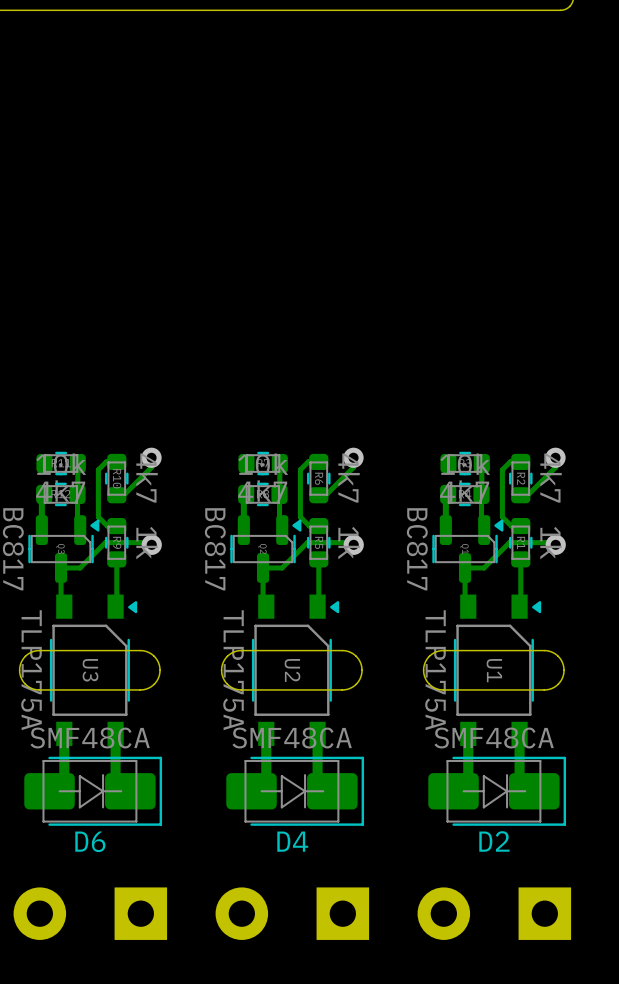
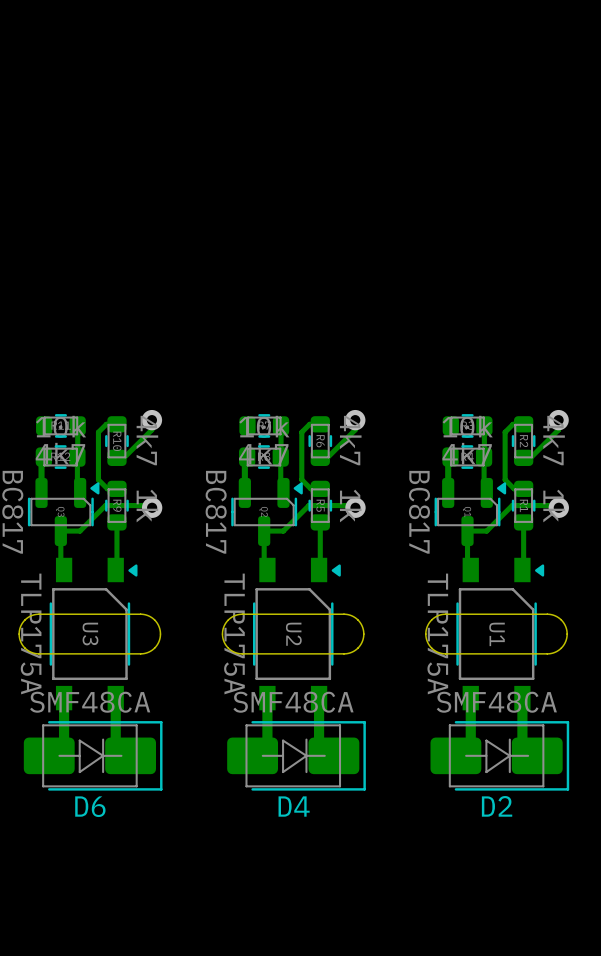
part: (90, 913) -> none
part: (292, 913) -> none
part: (494, 913) -> none

